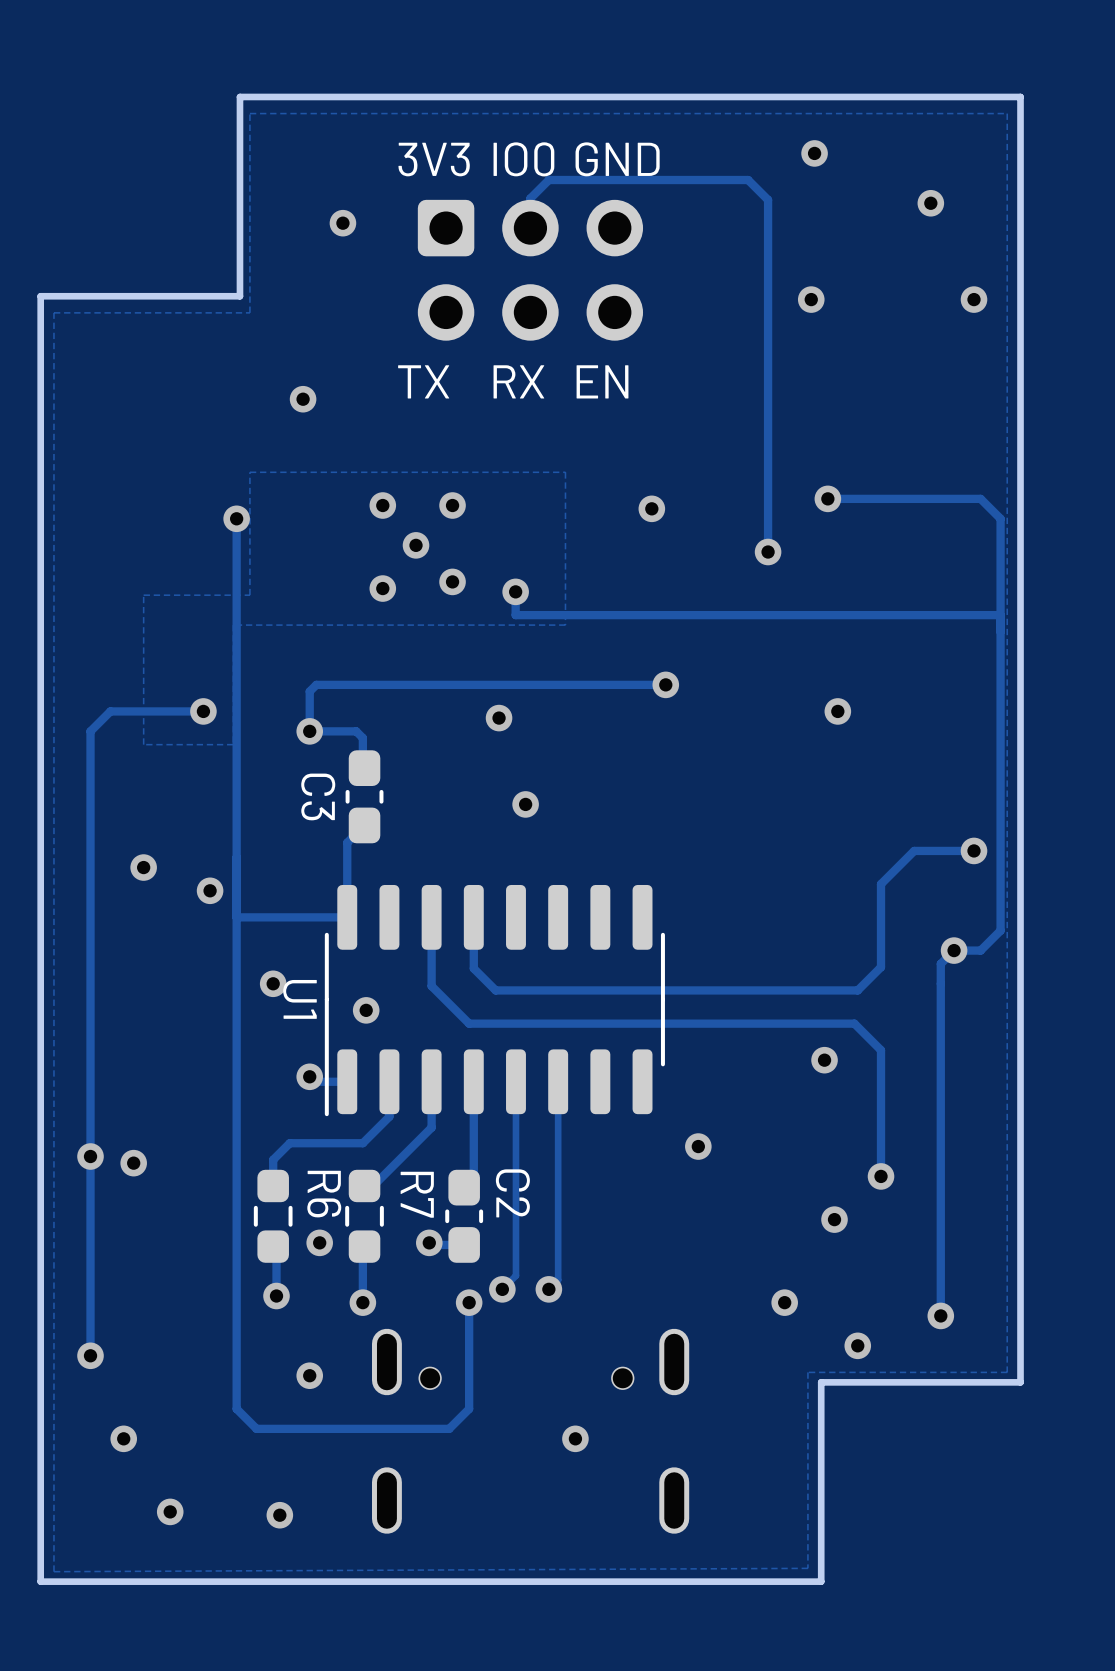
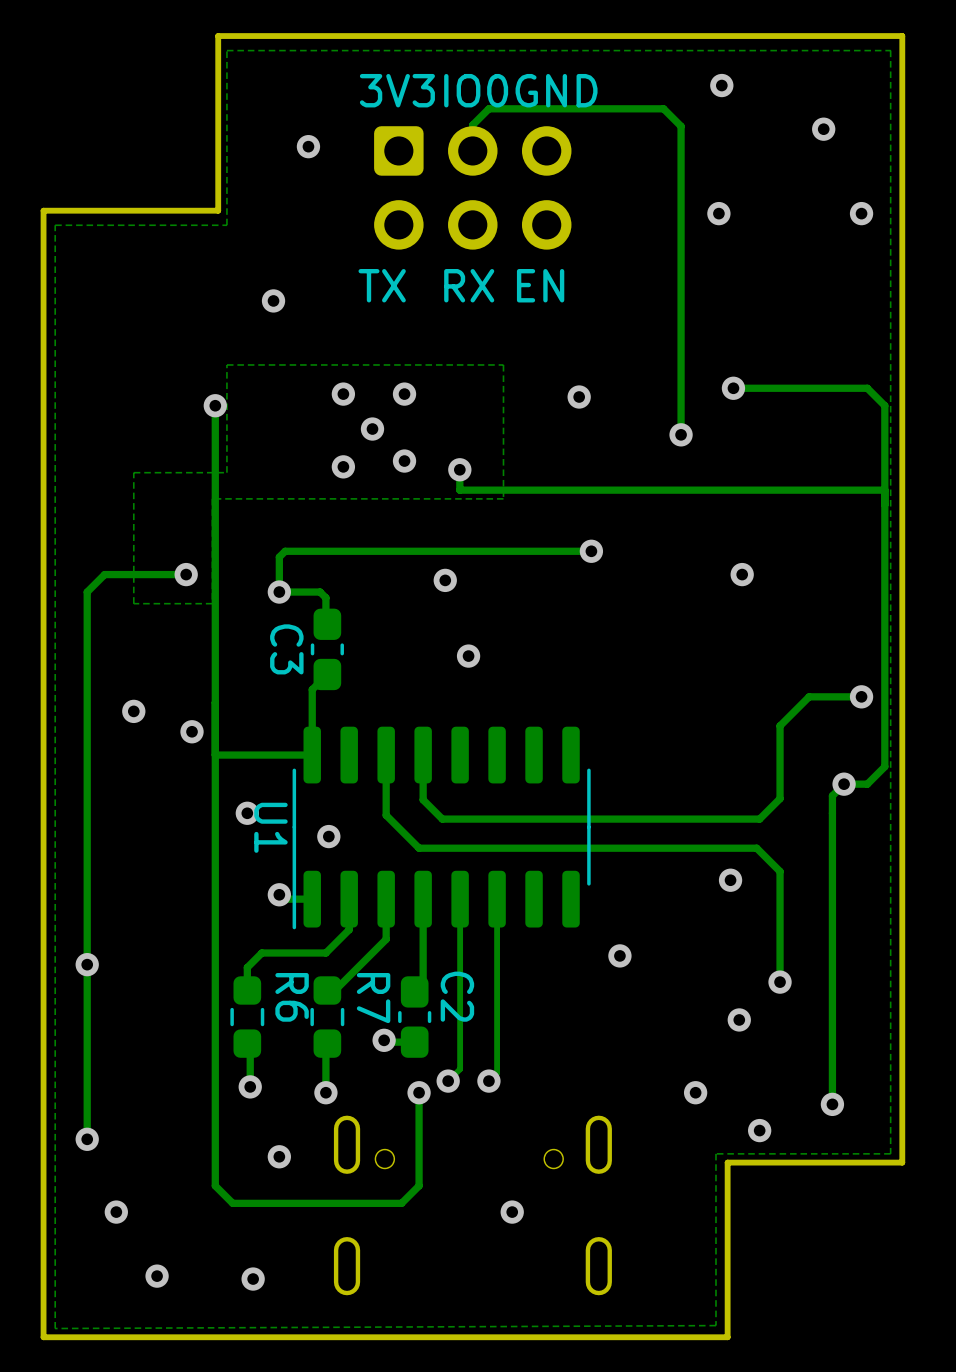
via: (133, 1163) -> none
via: (319, 1242) -> none

